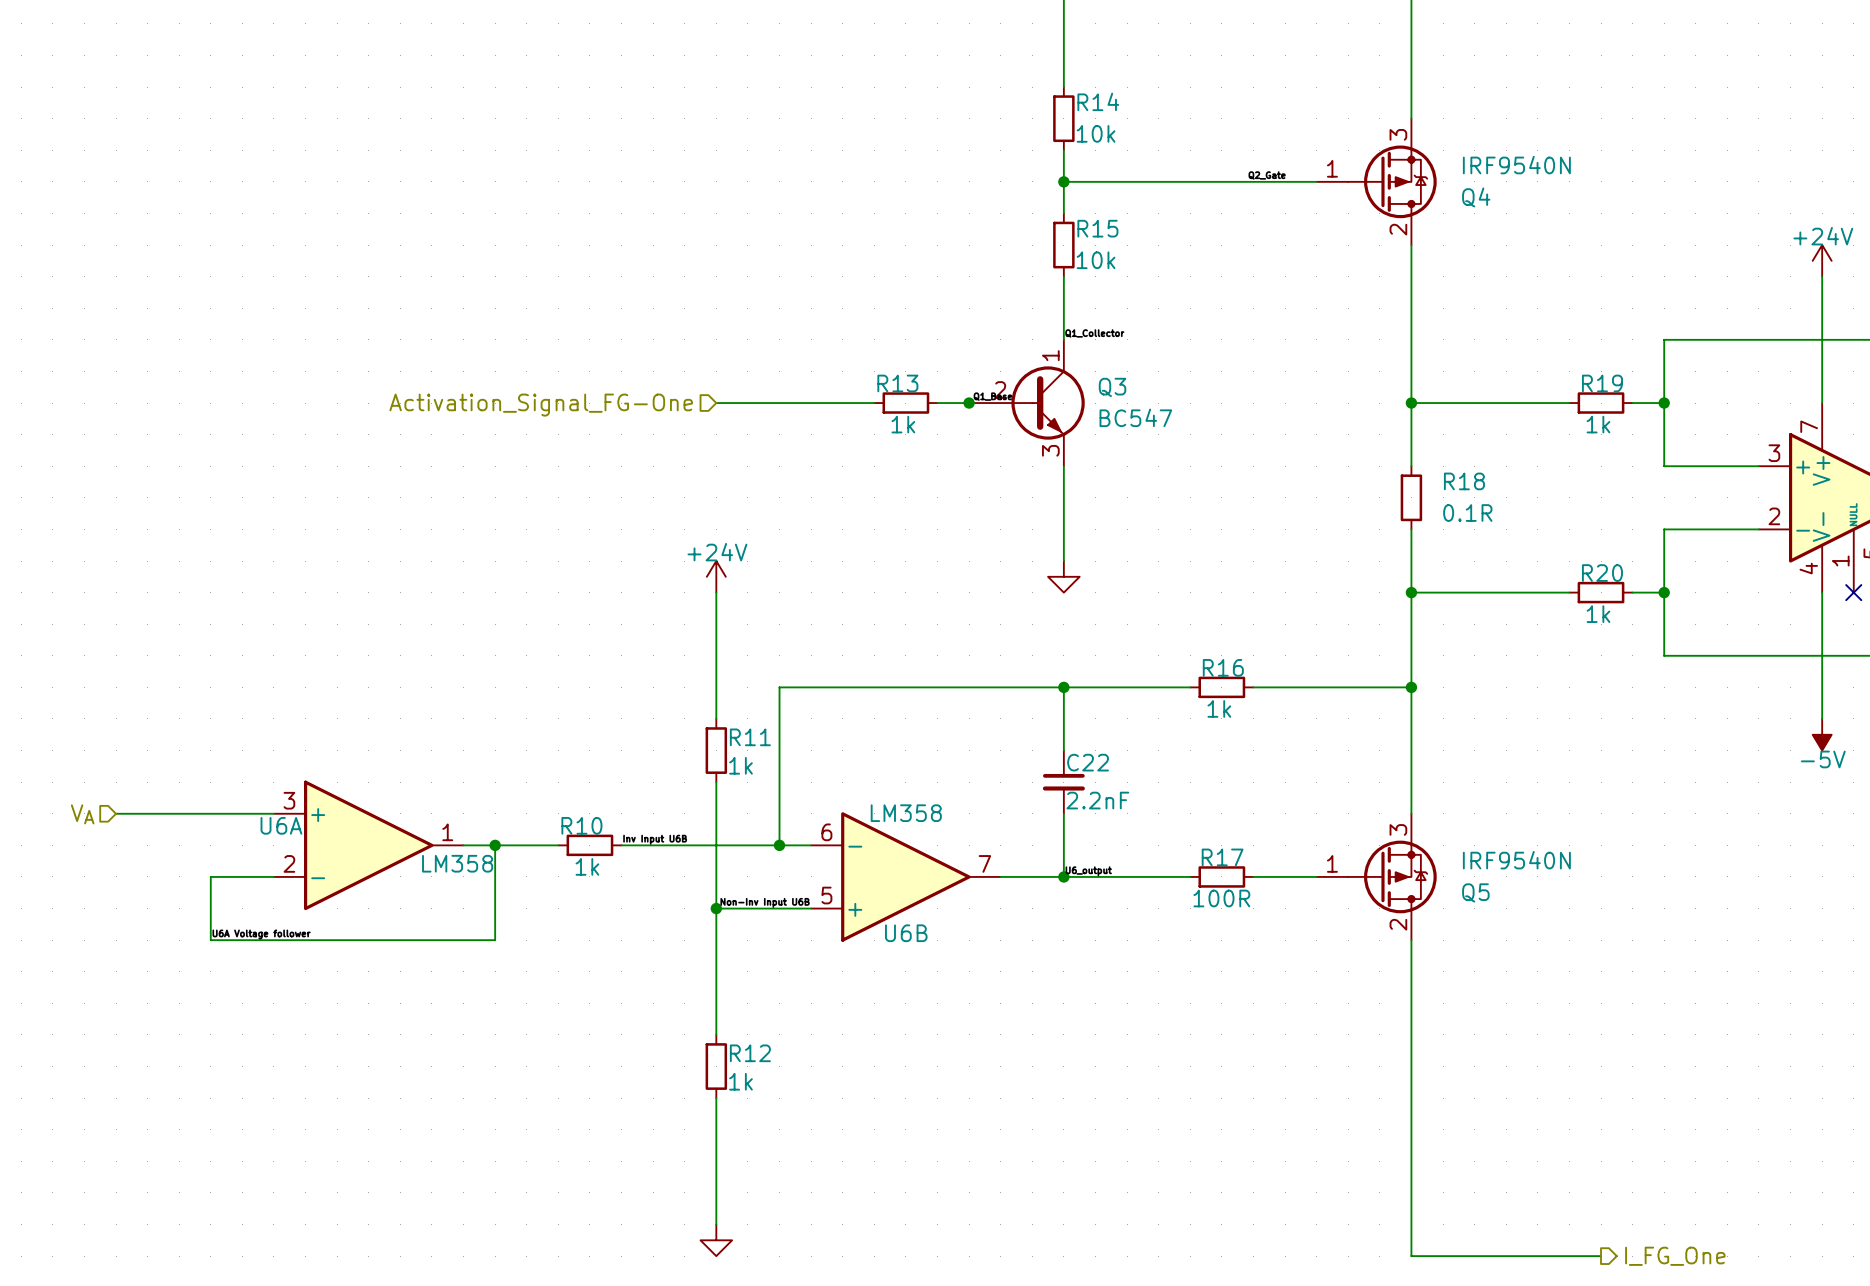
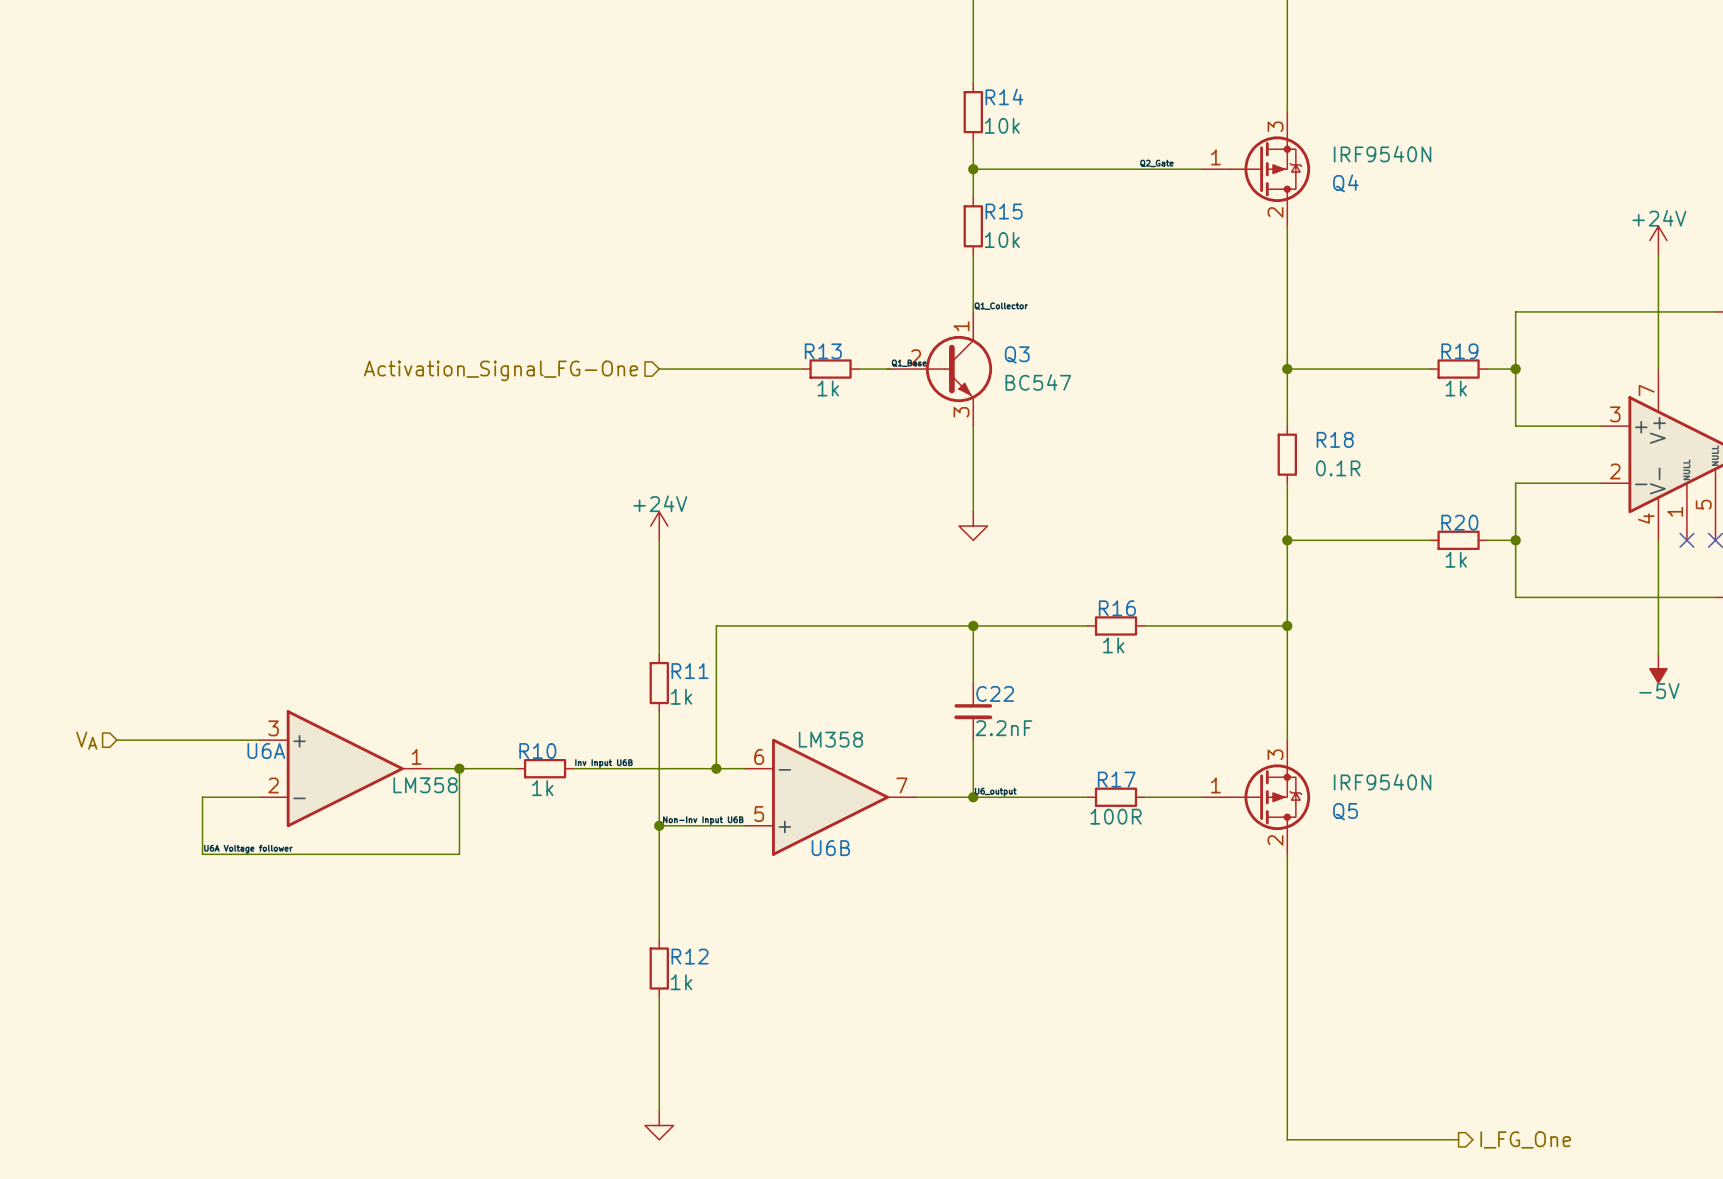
junction: (969, 403) -> none

